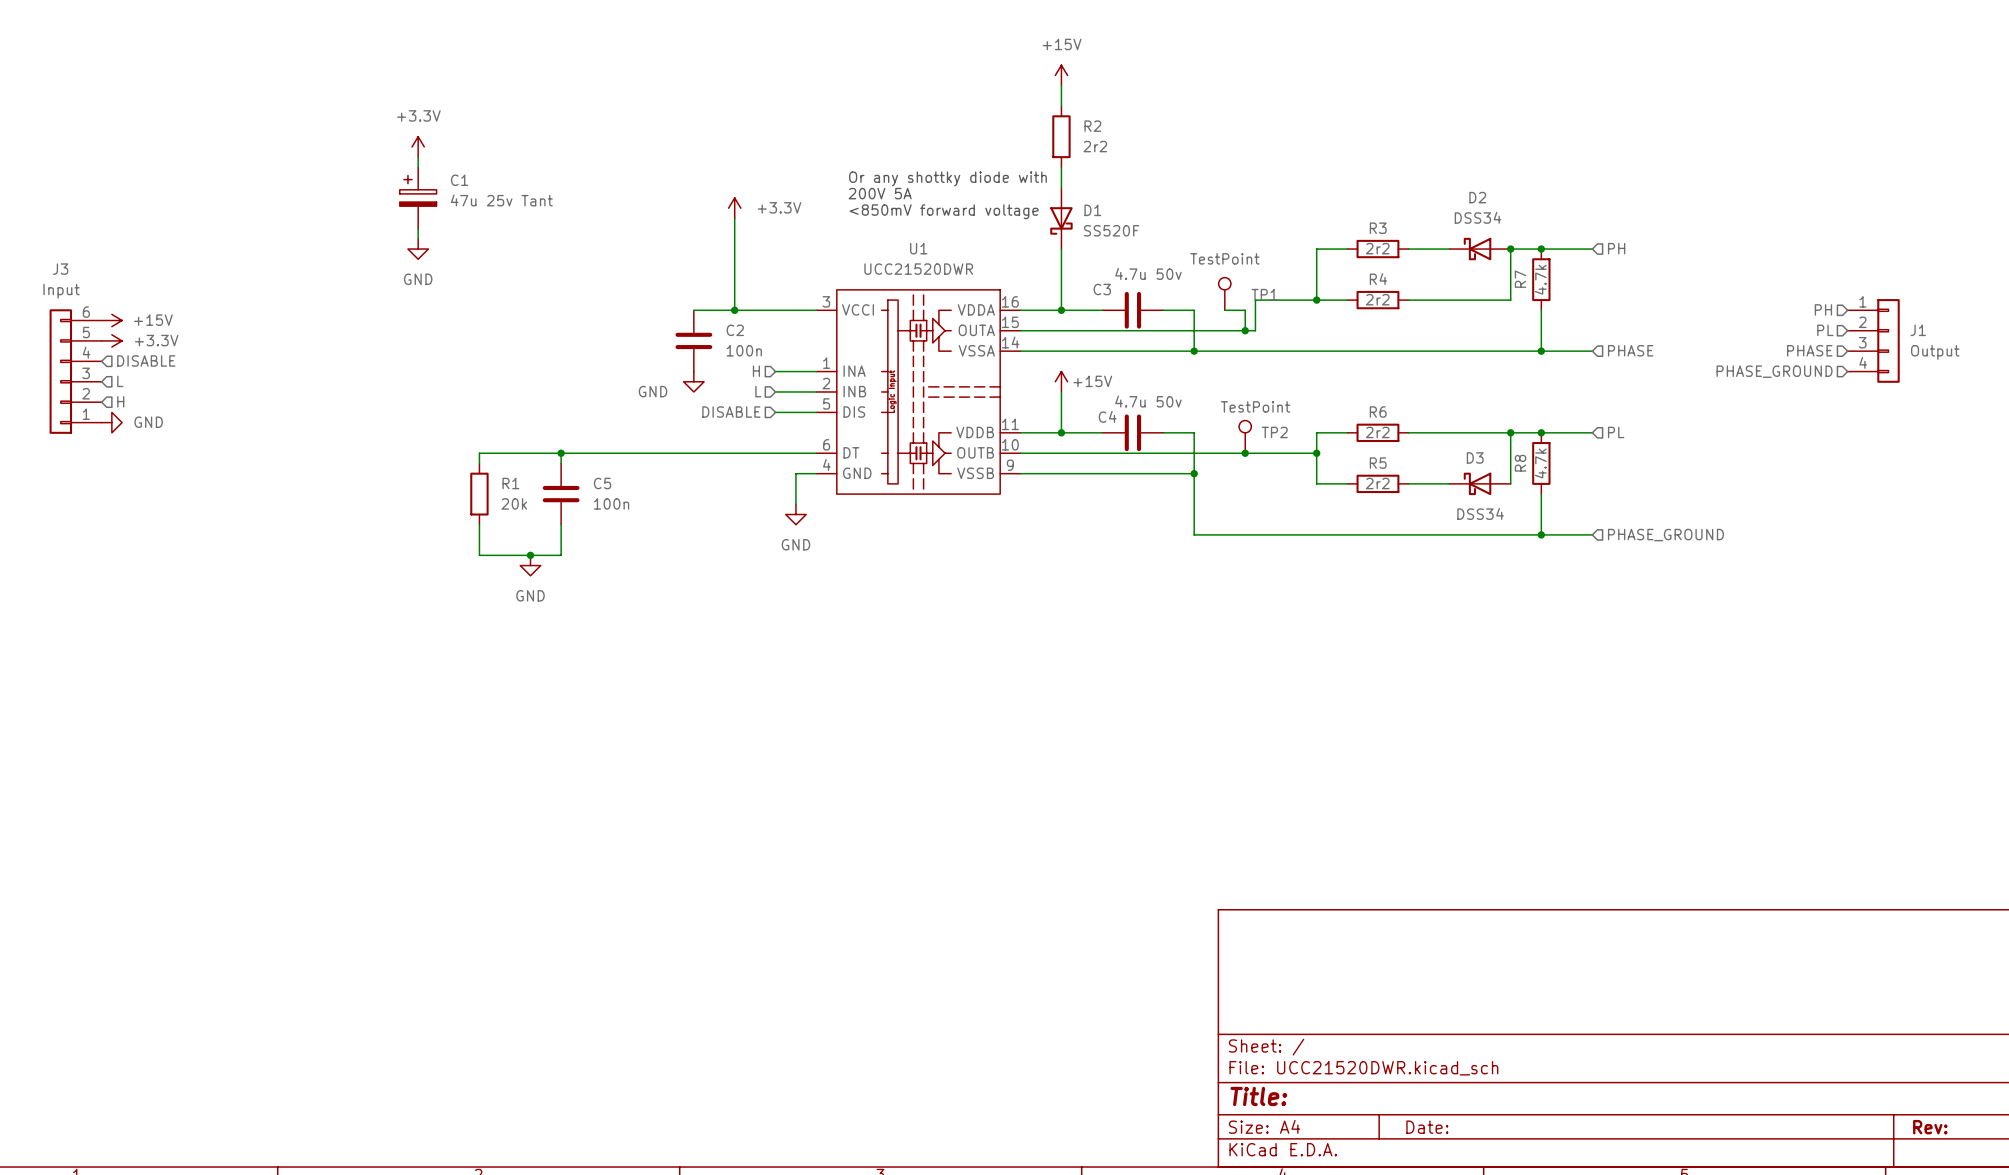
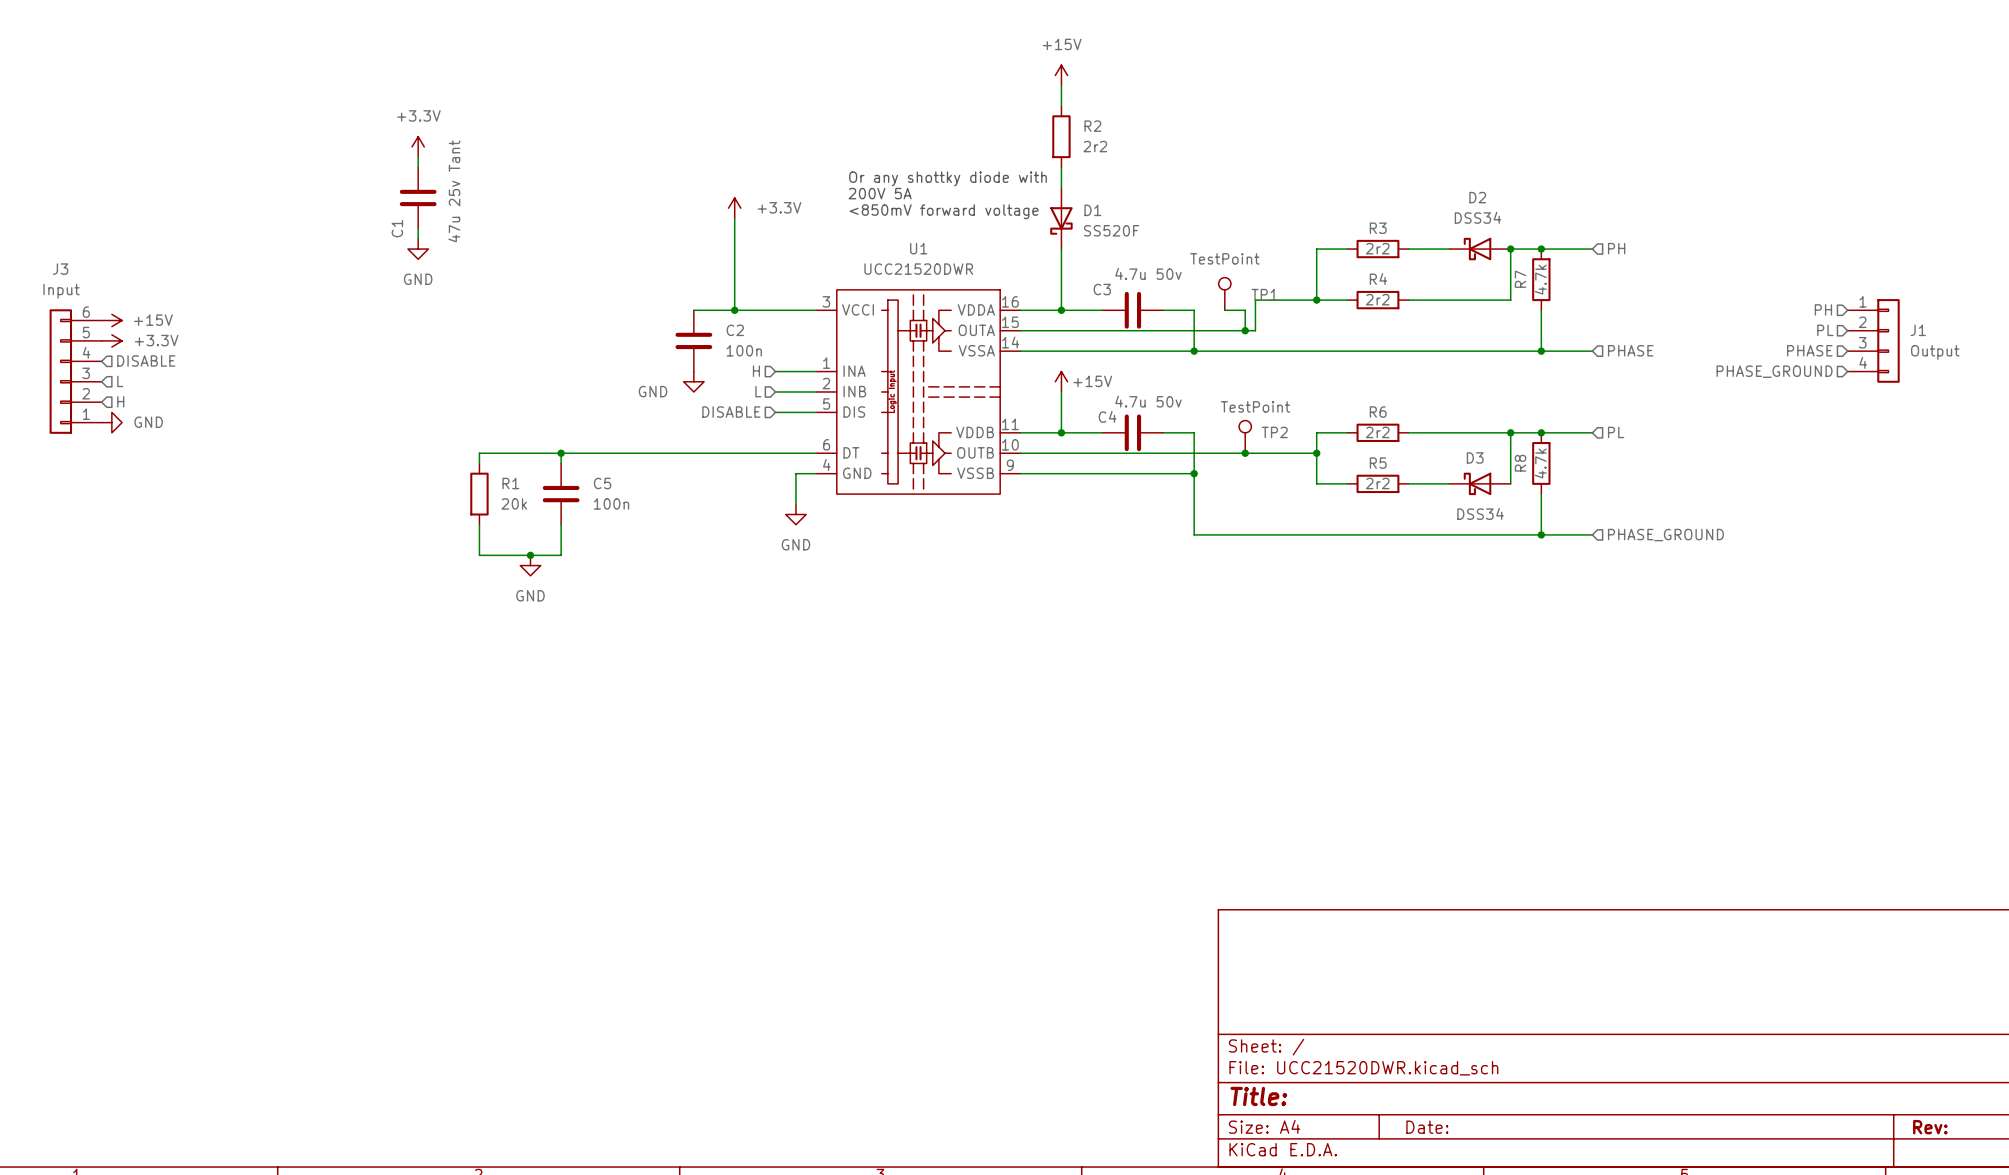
C1 symbol: [399, 167, 437, 229] -> [399, 167, 437, 229]
C1 name position: C1 (459, 180) -> C1 (397, 228)
C1 value position: 47u 25v Tant (501, 200) -> 47u 25v Tant (454, 191)

